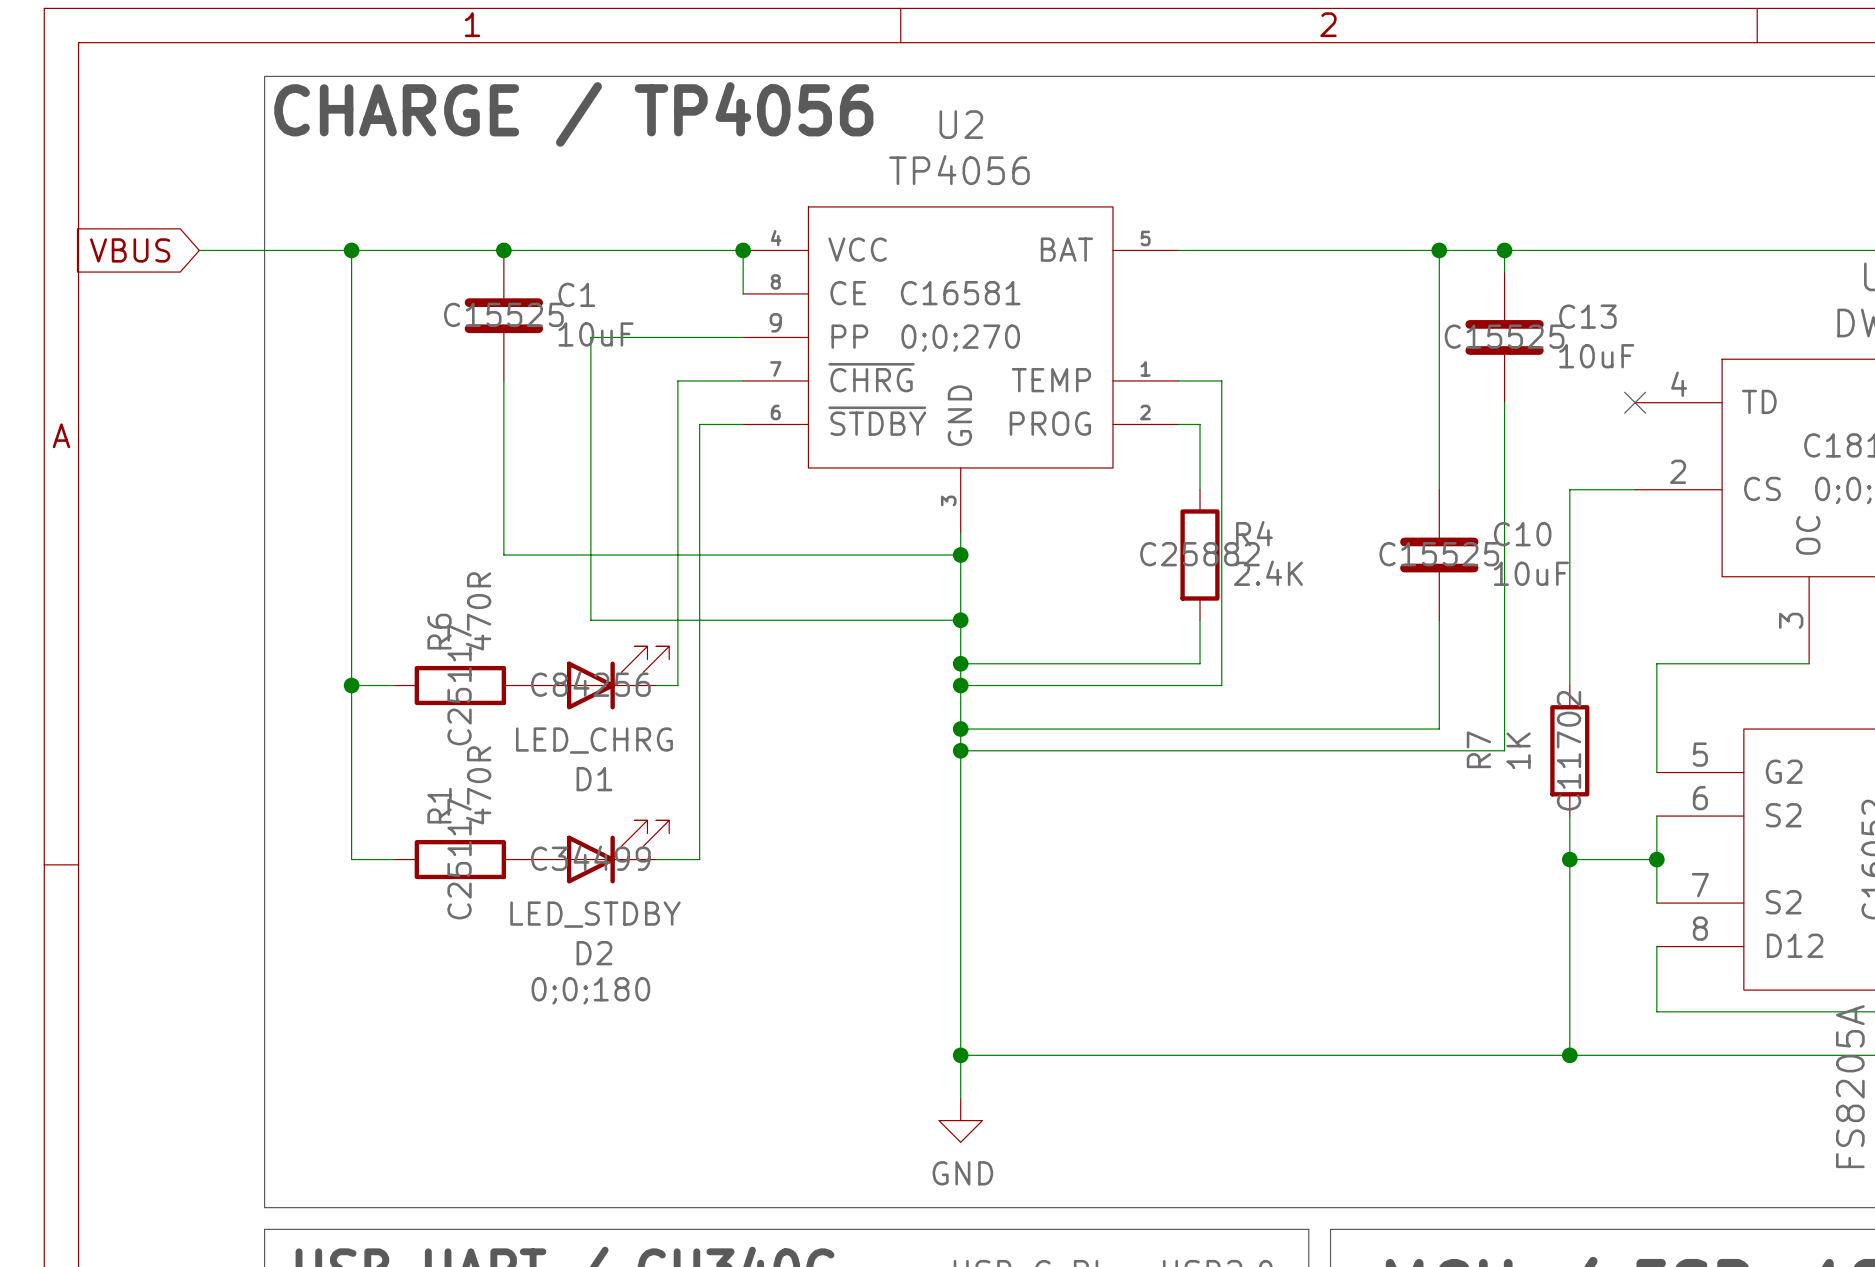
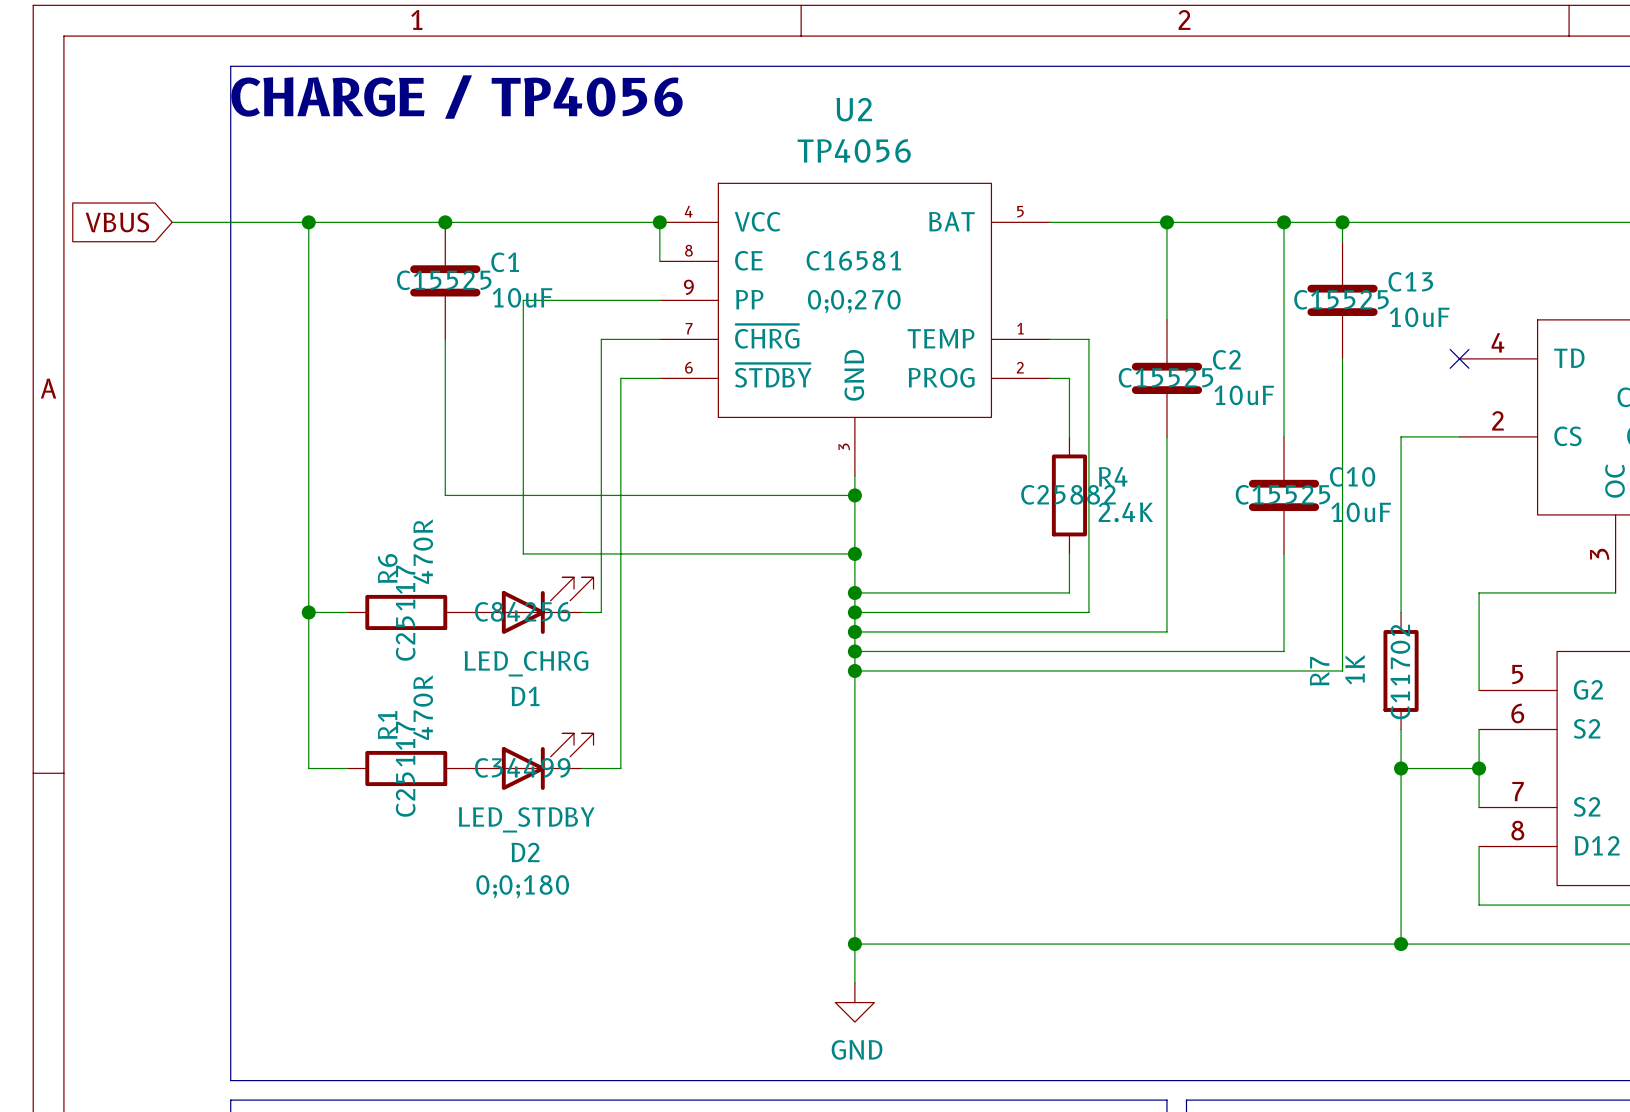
wire: none -> (1166, 222) (1166, 319)
junction: none -> (1166, 222)
C2: none -> 10uF (1166, 378)
wire: none -> (1166, 436) (1166, 631) (854, 631)
junction: none -> (854, 631)

